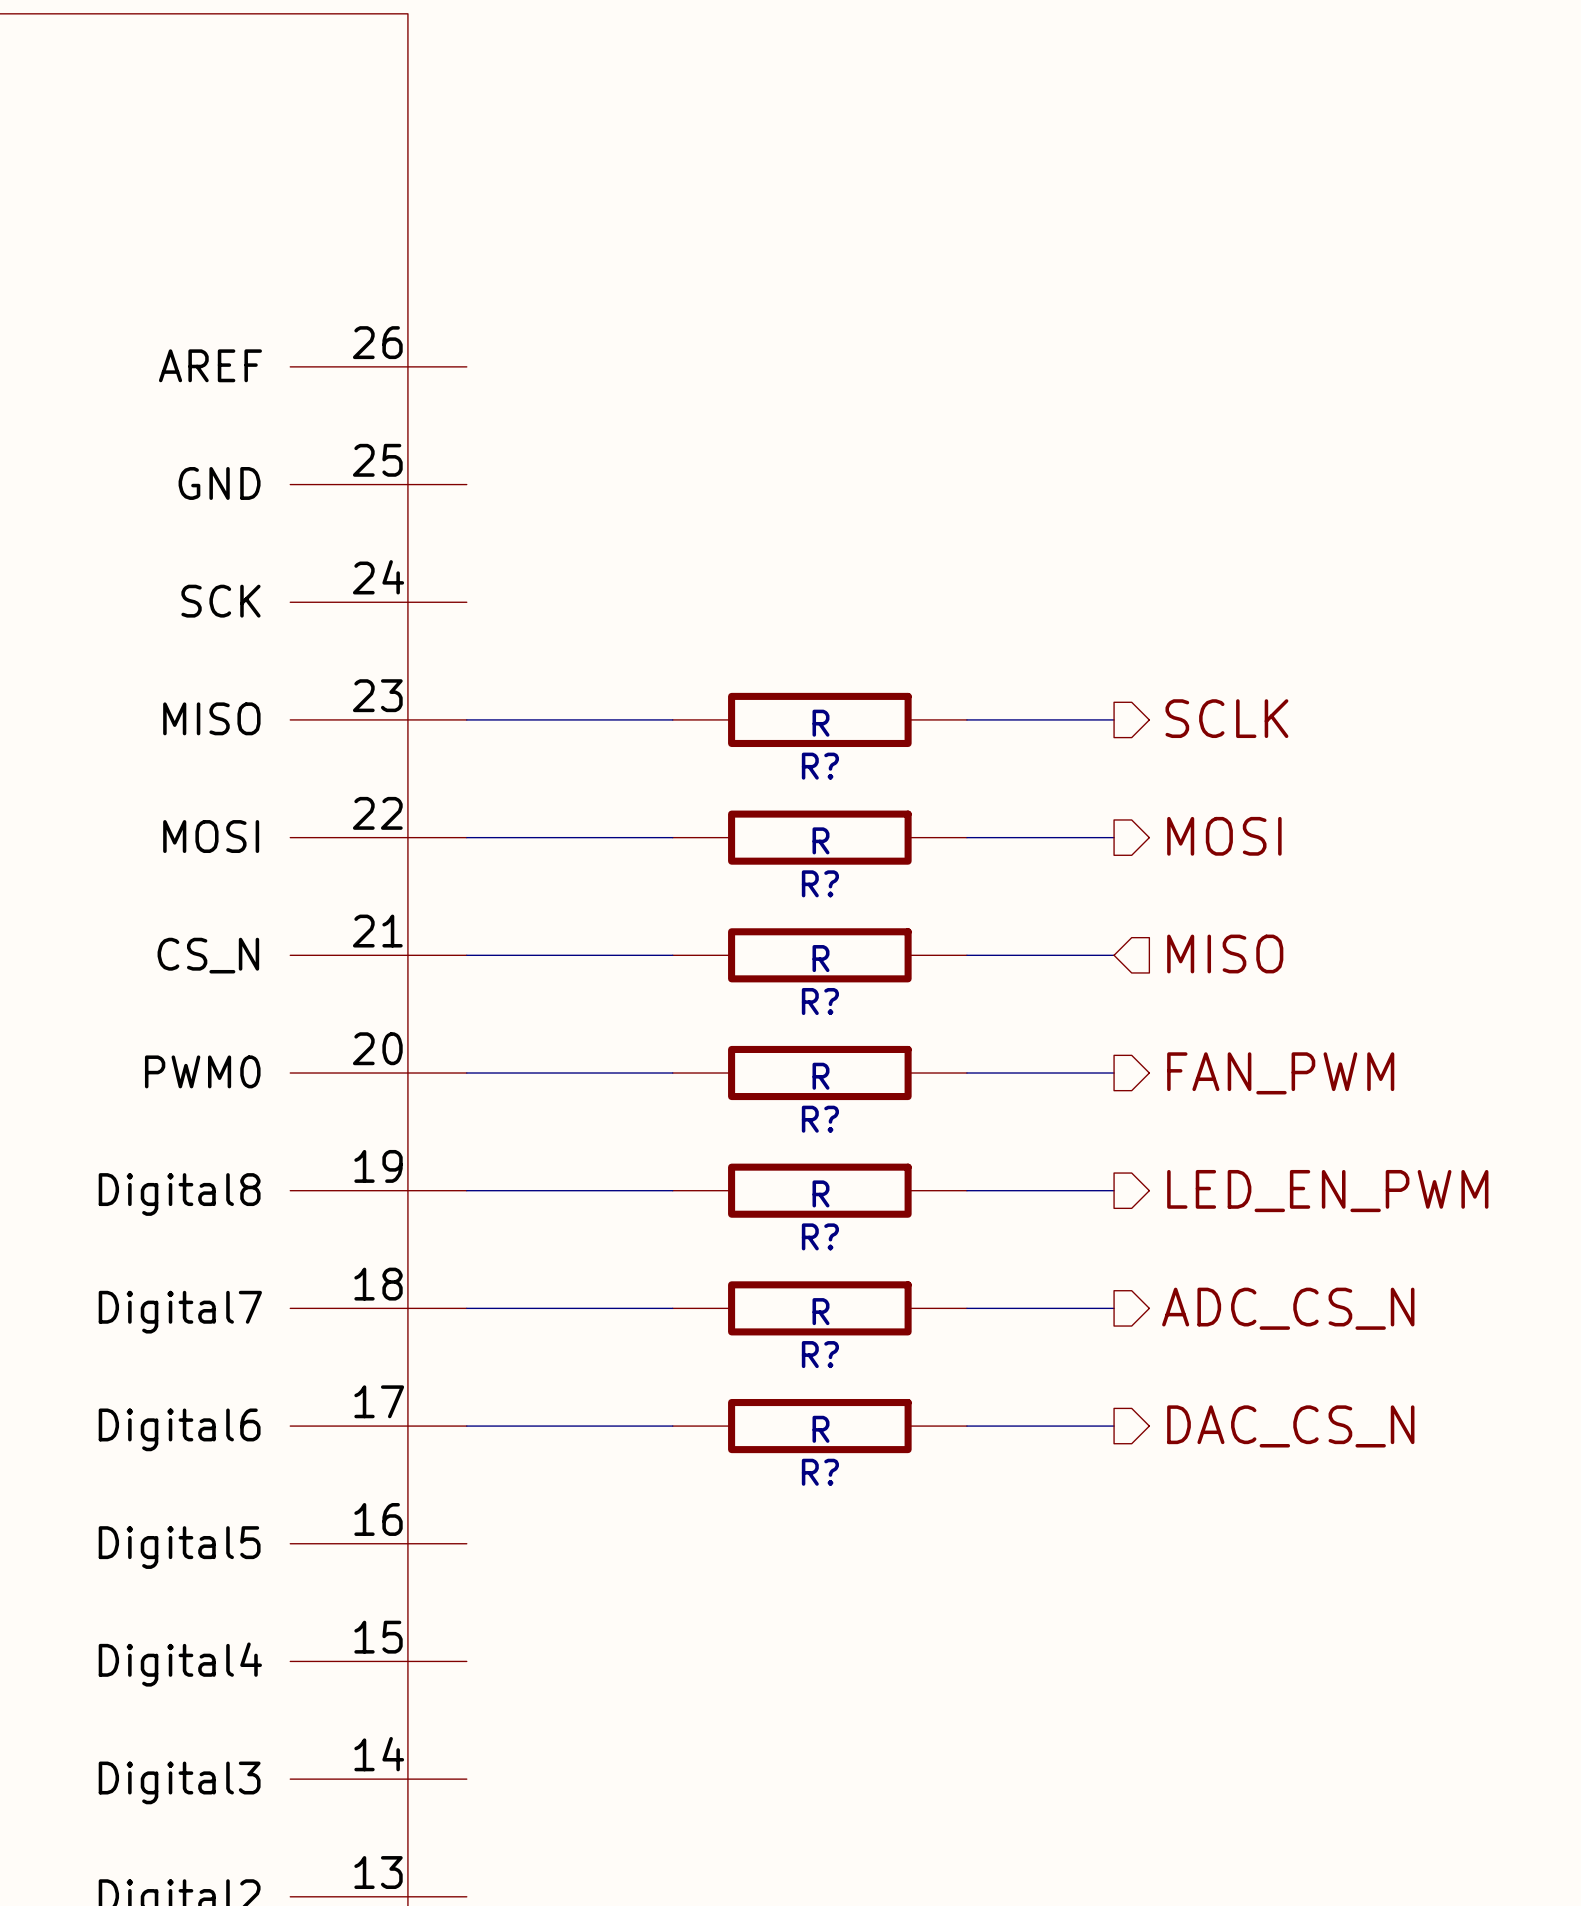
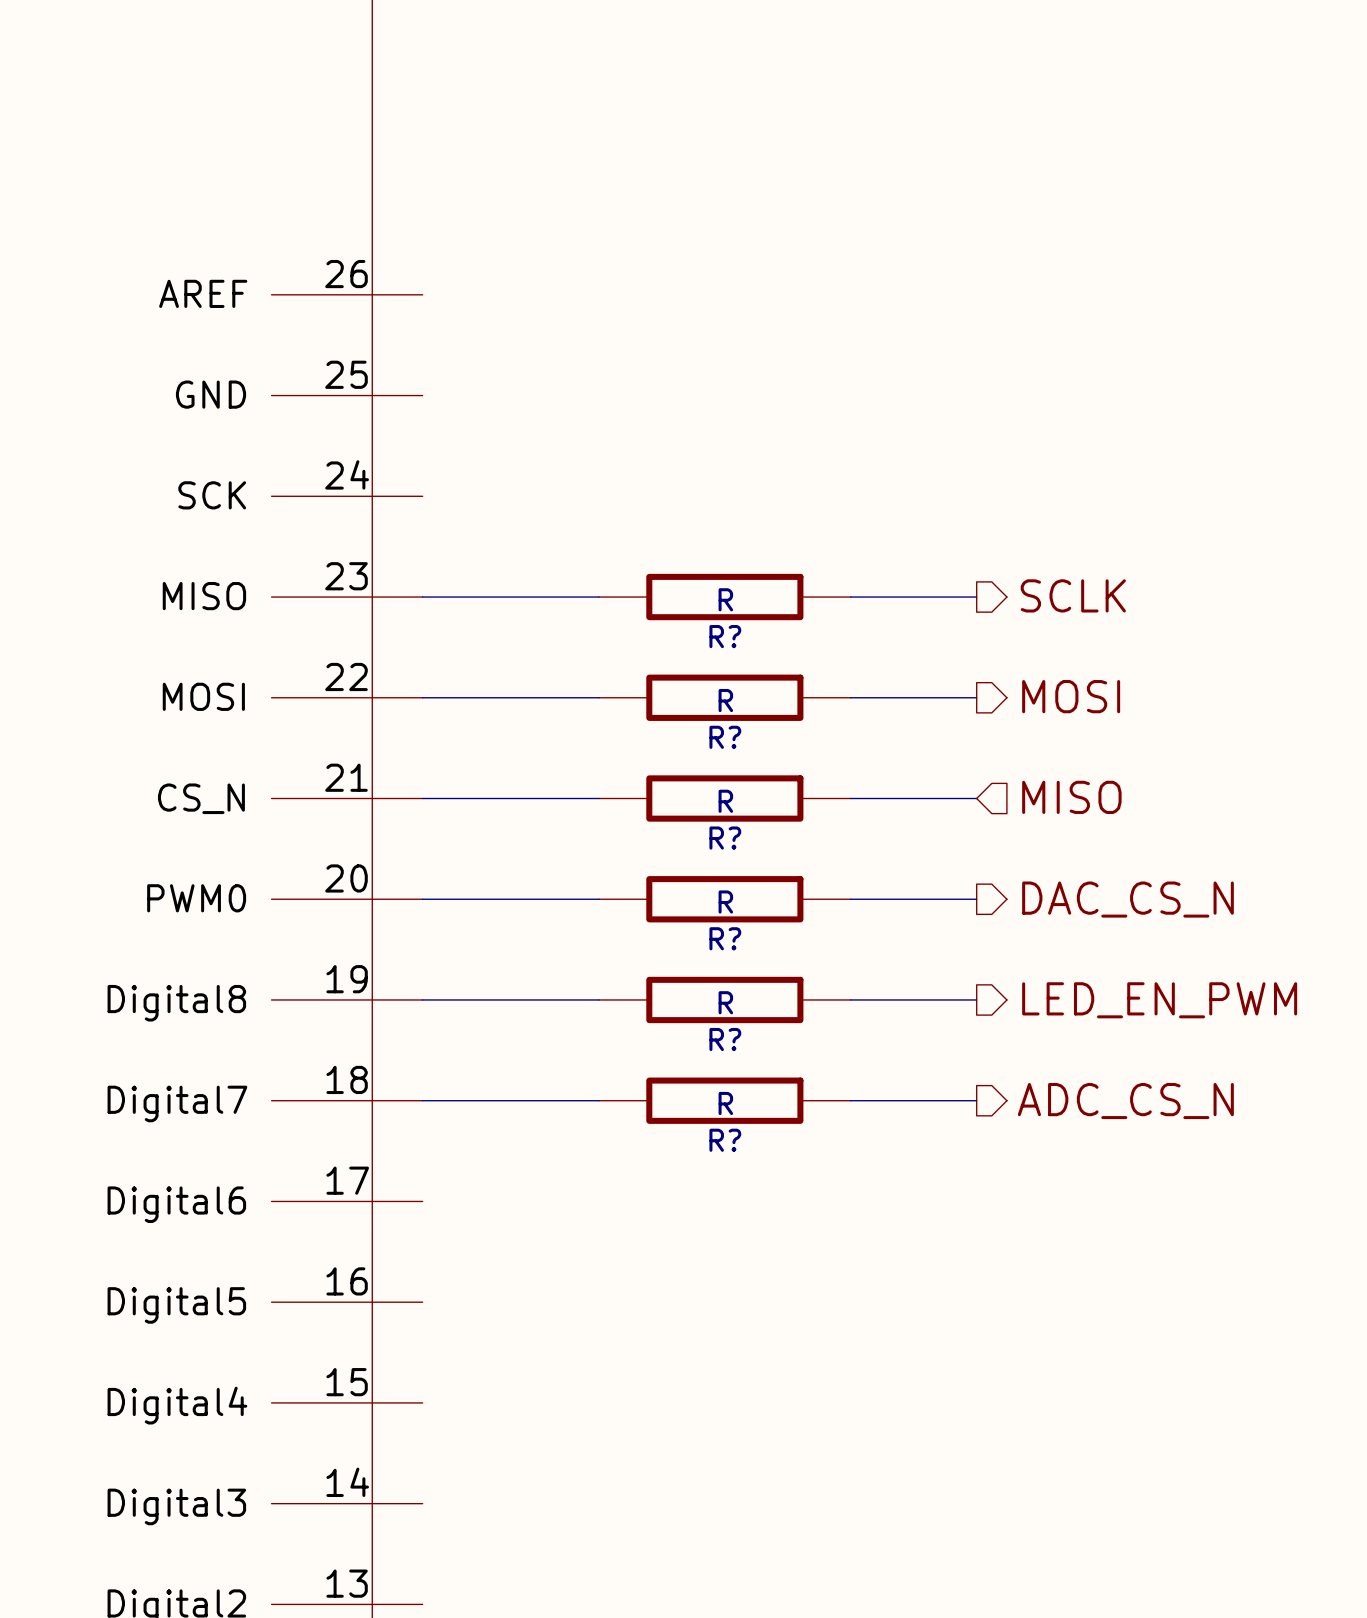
hierarchical label: FAN_PWM (1280, 1073) -> DAC_CS_N (1127, 899)
wire: (466, 1426) (672, 1426) -> none
R?: R (819, 1426) -> none
wire: (966, 1426) (1114, 1426) -> none
hierarchical label: DAC_CS_N (1290, 1426) -> none

